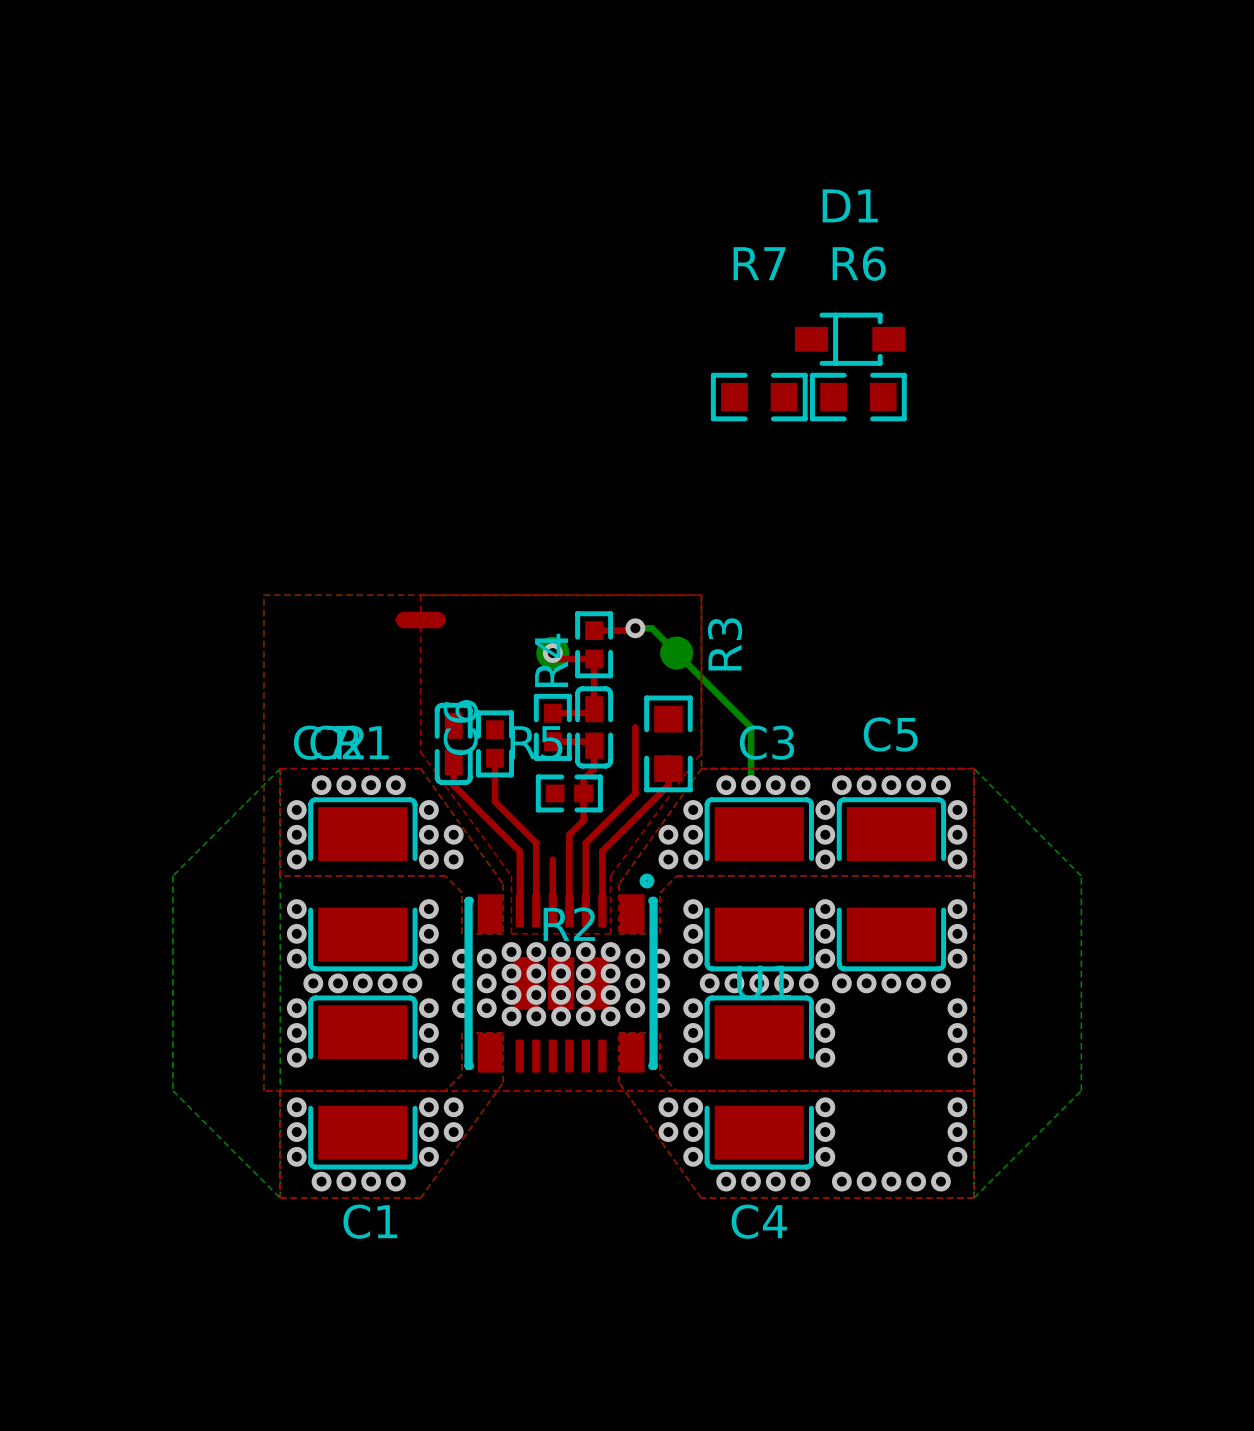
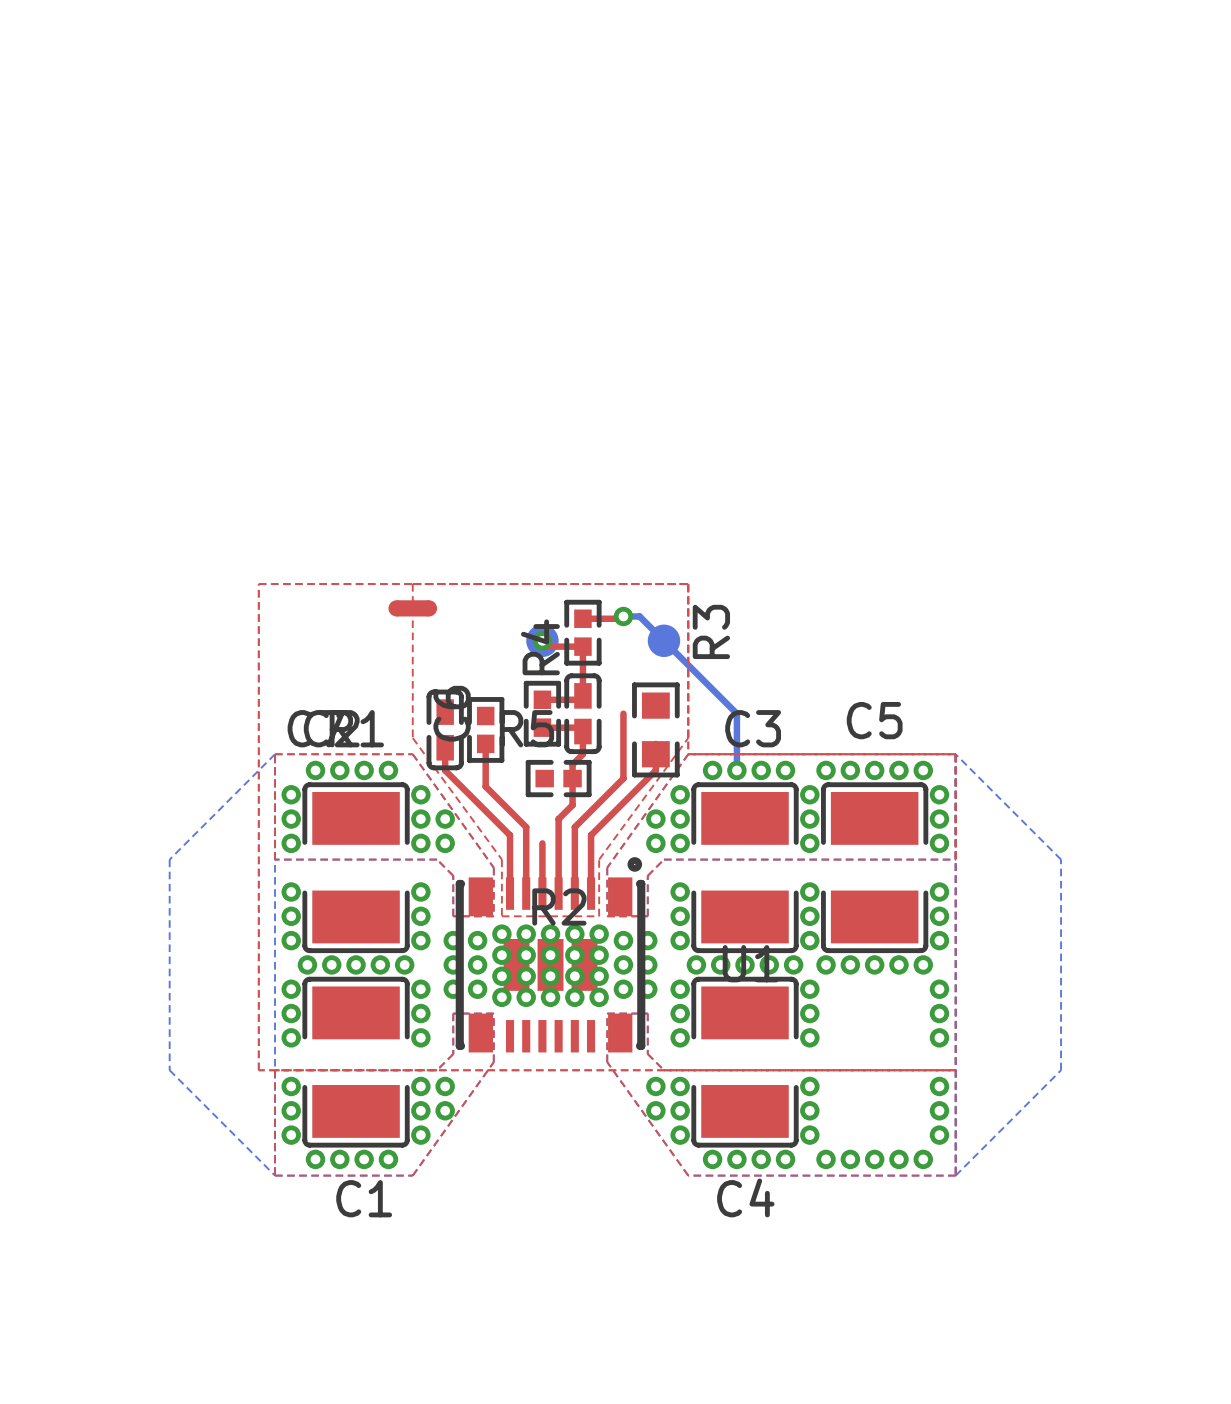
D1: (850, 339) -> none
R7: (759, 397) -> none
R6: (858, 397) -> none

